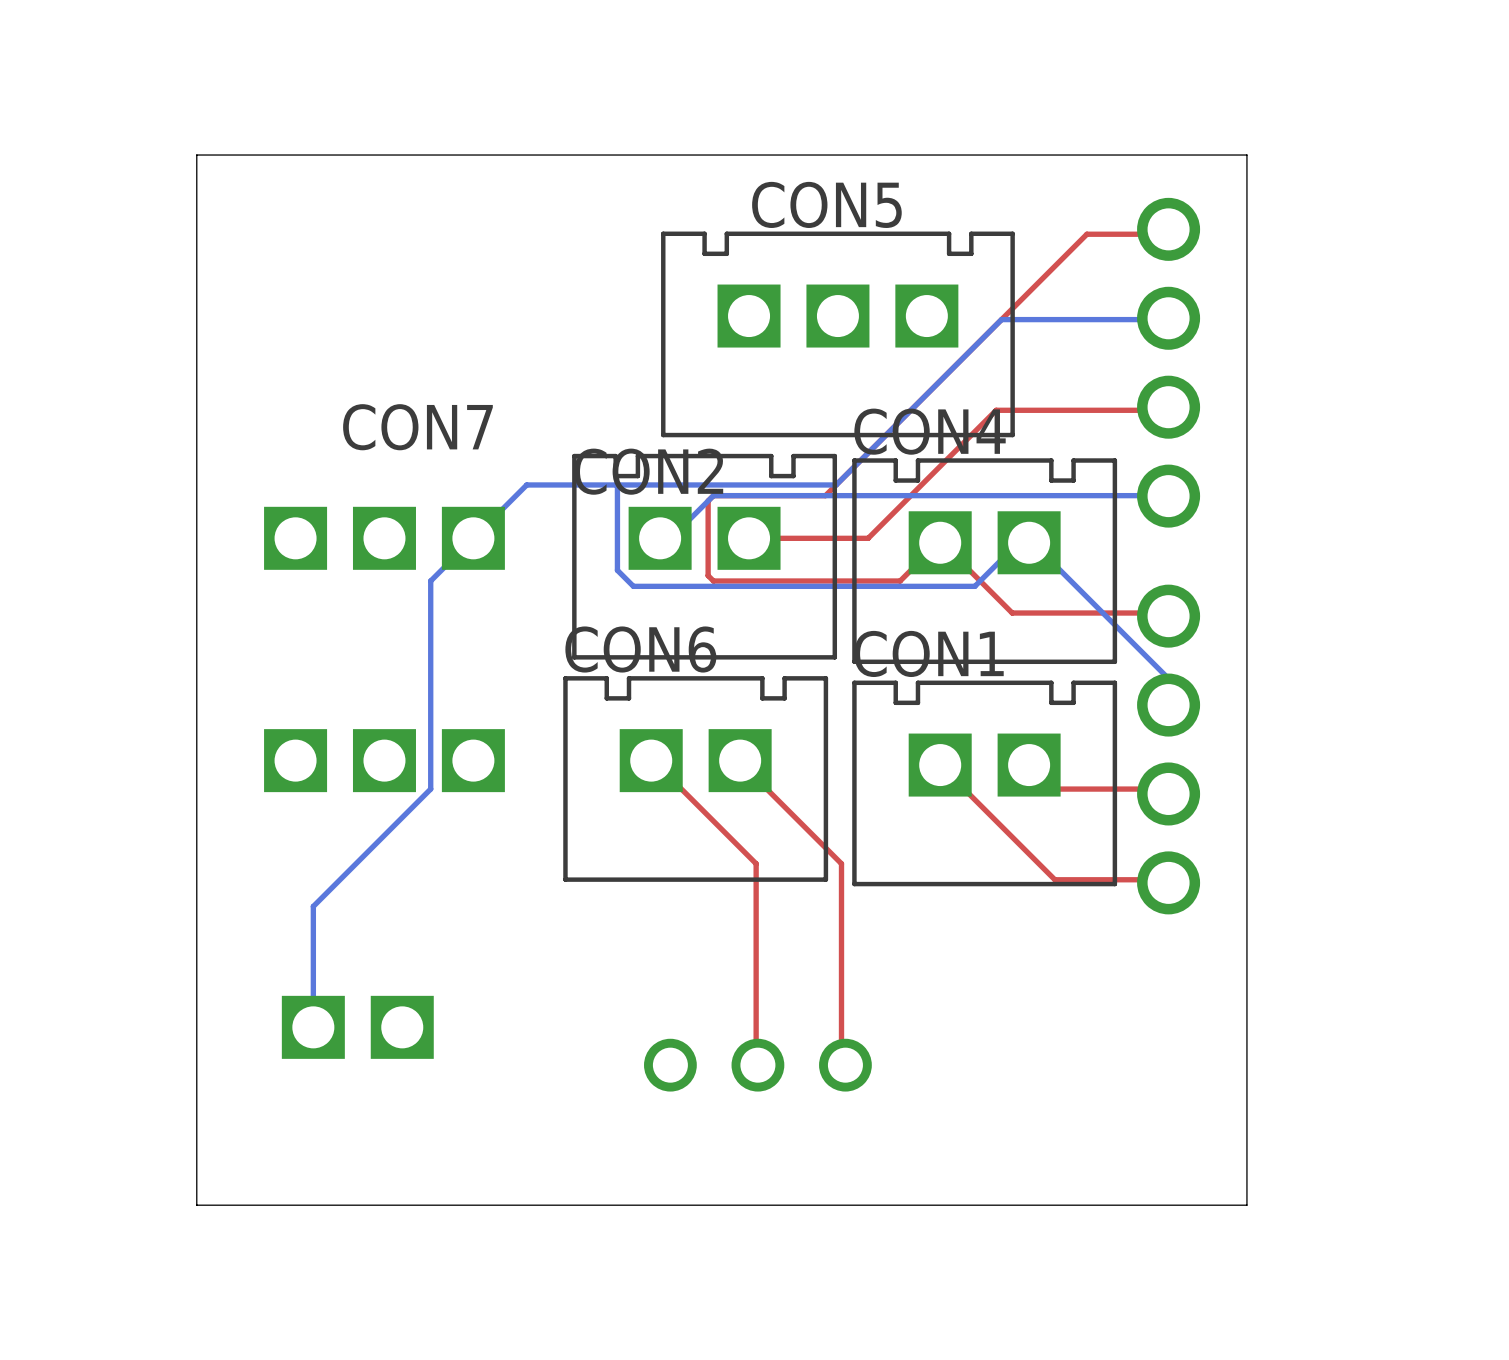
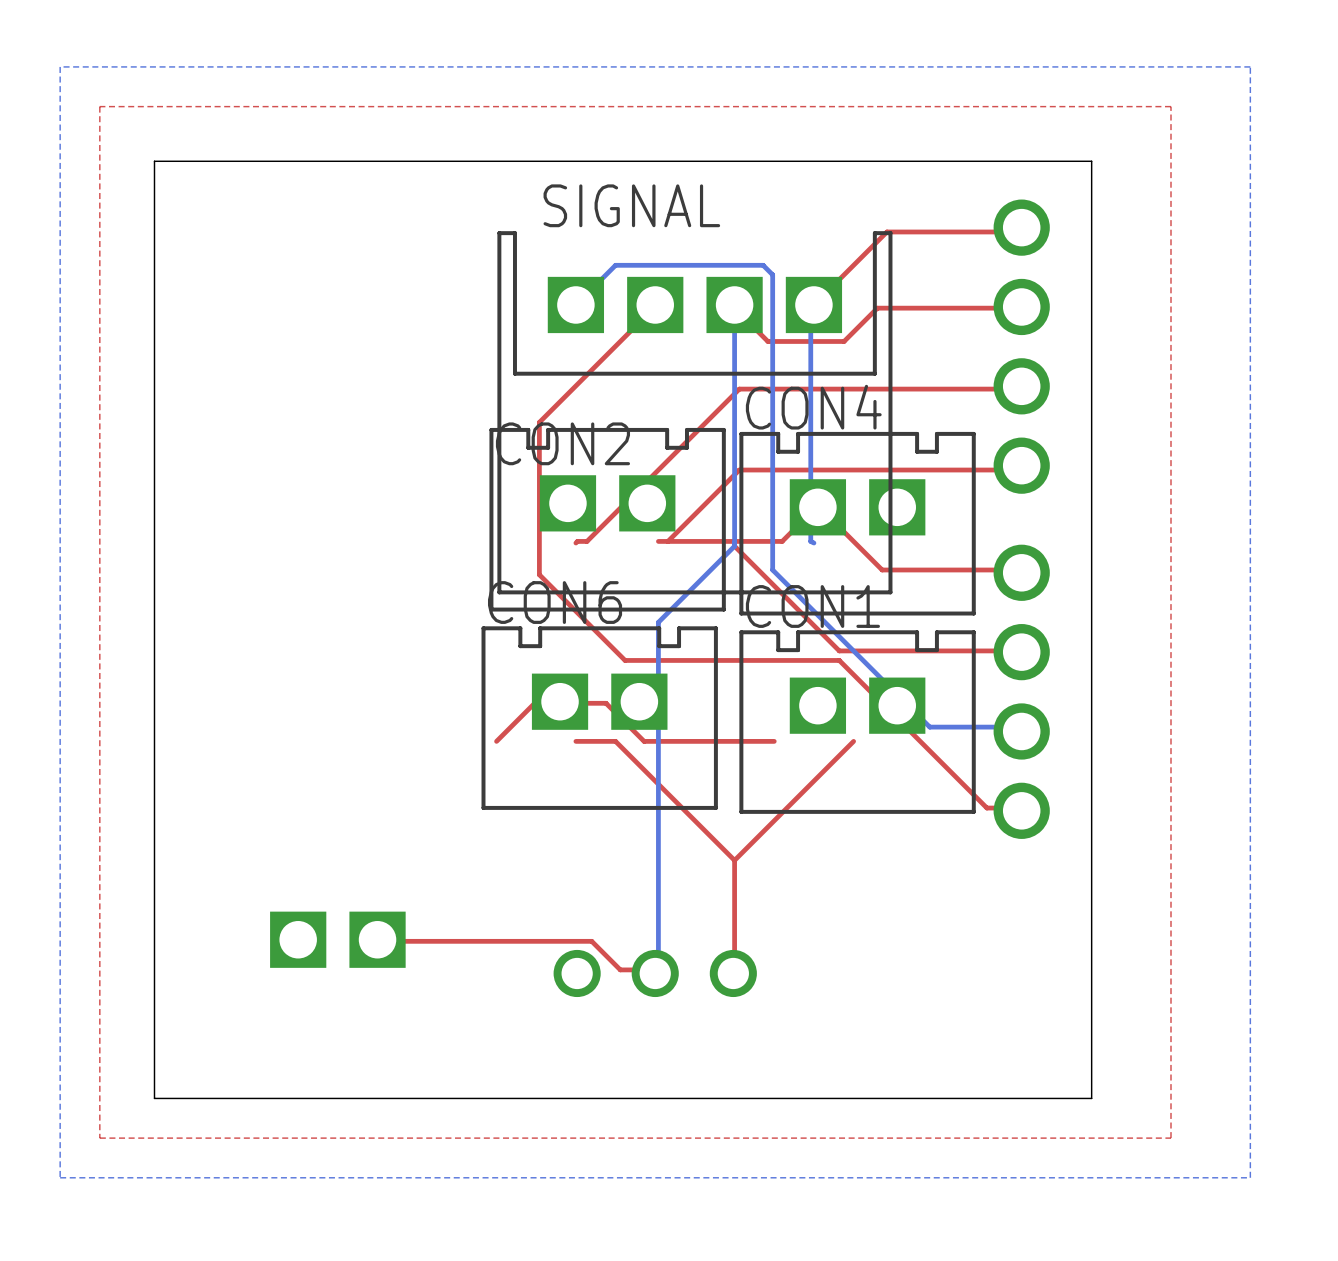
bottom zone outline: none -> (1250, 66) (60, 66) (60, 1177) (1250, 1177) (1250, 66)
top zone outline: none -> (1170, 106) (99, 106) (99, 1138) (1170, 1138) (1170, 106)
top track: (1086, 234) (825, 495) (713, 495) (708, 500) (708, 575) (713, 581) (761, 581) -> (948, 231) (886, 231) (813, 304)
bottom track: none -> (575, 304) (615, 265) (763, 265) (772, 274) (772, 569) (929, 727) (1020, 727) (1021, 731)
top track: none -> (734, 304) (734, 308) (767, 341) (844, 341) (877, 308) (1021, 306)
bottom track: none -> (734, 304) (734, 546) (658, 622) (658, 969) (655, 973)
bottom track: none -> (813, 304) (810, 308) (810, 541) (813, 543)
bottom track: (1168, 318) (1001, 319) (836, 484) (526, 484) (430, 581) (430, 789) (313, 906) (313, 1027) -> none
CON5: (837, 334) -> none
top track: (996, 410) (868, 538) (749, 538) -> (867, 389) (739, 389) (587, 541) (575, 543)
SIGNAL: none -> (694, 412)
bottom track: (617, 484) (617, 570) (633, 586) (974, 586) (1017, 543) (1033, 543) (1166, 677) (1166, 703) (1168, 705) -> none
top track: none -> (1021, 465) (1020, 470) (739, 470) (667, 541)
bottom track: (1168, 496) (713, 495) (670, 538) (660, 538) -> none
CON7: (384, 538) -> none
top track: none -> (734, 543) (734, 546) (839, 650) (1021, 652)
part: (384, 760) -> none
top track: (651, 760) (756, 863) (756, 1061) -> (377, 939) (377, 941) (591, 941) (620, 969) (653, 969)
top track: (740, 760) (841, 863) (841, 1061) (845, 1065) -> (734, 860) (733, 973)
top track: (940, 765) (1054, 879) (1129, 879) -> (655, 304) (539, 422) (539, 574) (625, 660) (839, 660) (986, 808)
top track: (1029, 765) (1054, 789) (1166, 789) (1168, 793) -> none
top track: none -> (575, 741) (615, 741) (734, 860)
top track: none -> (774, 741) (644, 741) (606, 703) (534, 703) (496, 741)
top track: none -> (853, 741) (734, 860)
part position: (357, 1027) -> (337, 939)

